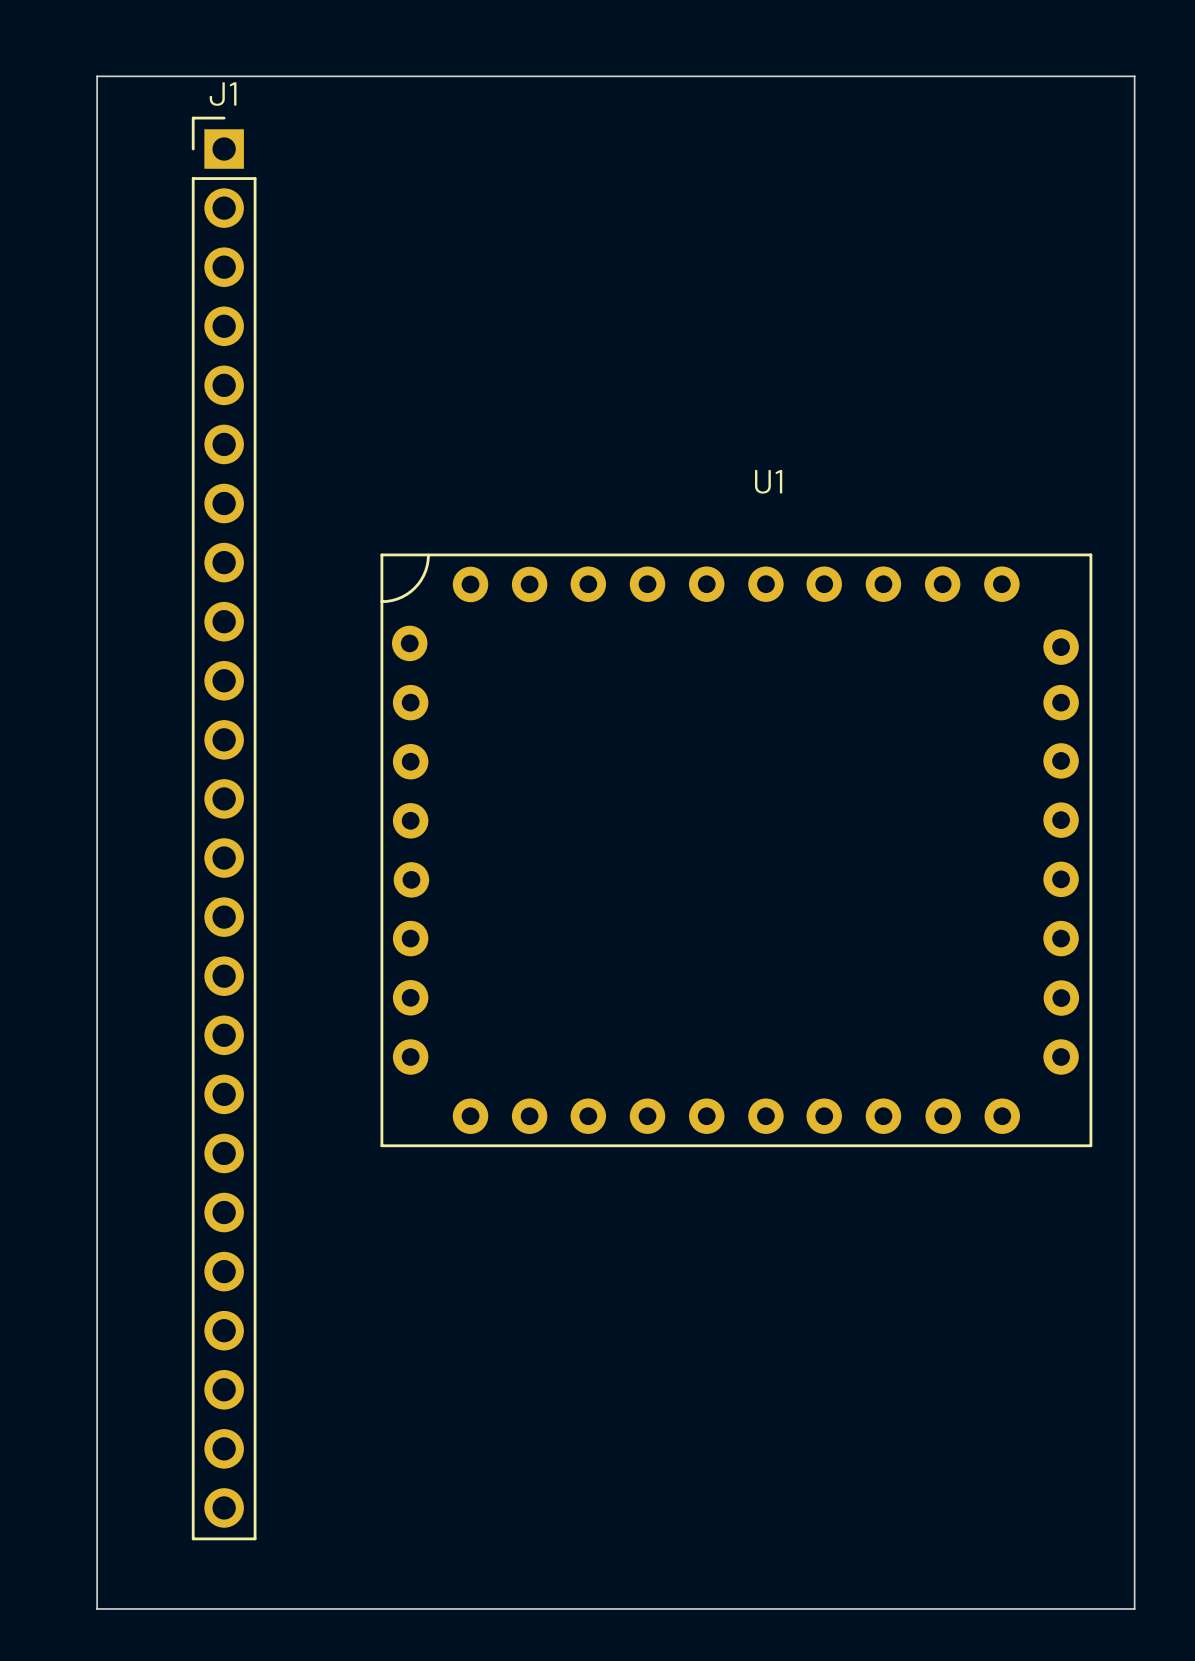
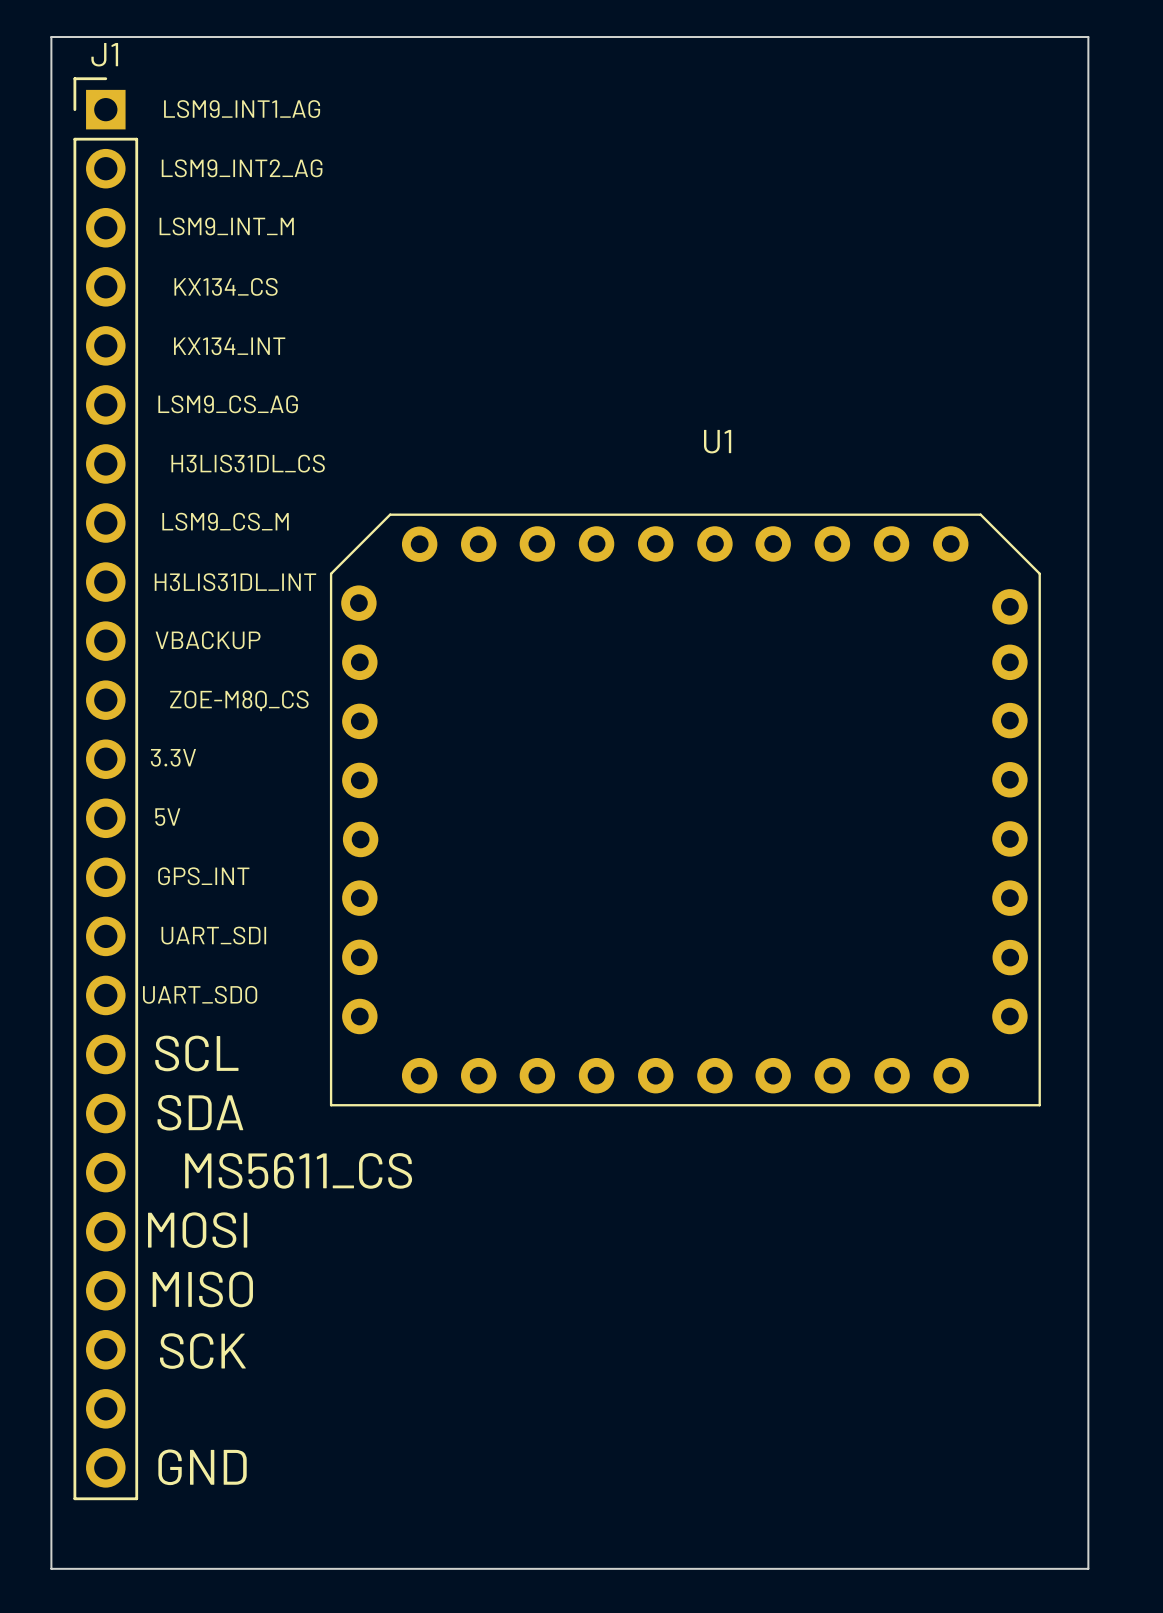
text: none -> LSM9_INT1_AG (242, 109)
text: none -> LSM9_INT2_AG (242, 168)
text: none -> LSM9_INT_M (226, 226)
text: none -> KX134_CS (226, 286)
text: none -> KX134_INT (229, 346)
text: none -> LSM9_CS_AG (228, 404)
text: none -> H3LIS31DL_CS (248, 463)
U1 footprint: [380, 553, 1093, 1148] -> [329, 513, 1041, 1107]
text: none -> LSM9_CS_M (225, 521)
text: none -> H3LIS31DL_INT (235, 582)
text: none -> VBACKUP (208, 640)
text: none -> ZOE-M8Q_CS (239, 700)
text: none -> 3.3V (173, 757)
J1 position: (224, 828) -> (105, 788)
text: none -> 5V (167, 817)
text: none -> GPS_INT (203, 876)
text: none -> UART_SDI (213, 935)
text: none -> UART_SDO (200, 994)
text: none -> SCL (196, 1053)
text: none -> SDA (200, 1112)
text: none -> MS5611_CS (298, 1170)
text: none -> MOSI (197, 1230)
text: none -> MISO (202, 1289)
text: none -> SCK (202, 1351)
text: none -> GND (202, 1467)

